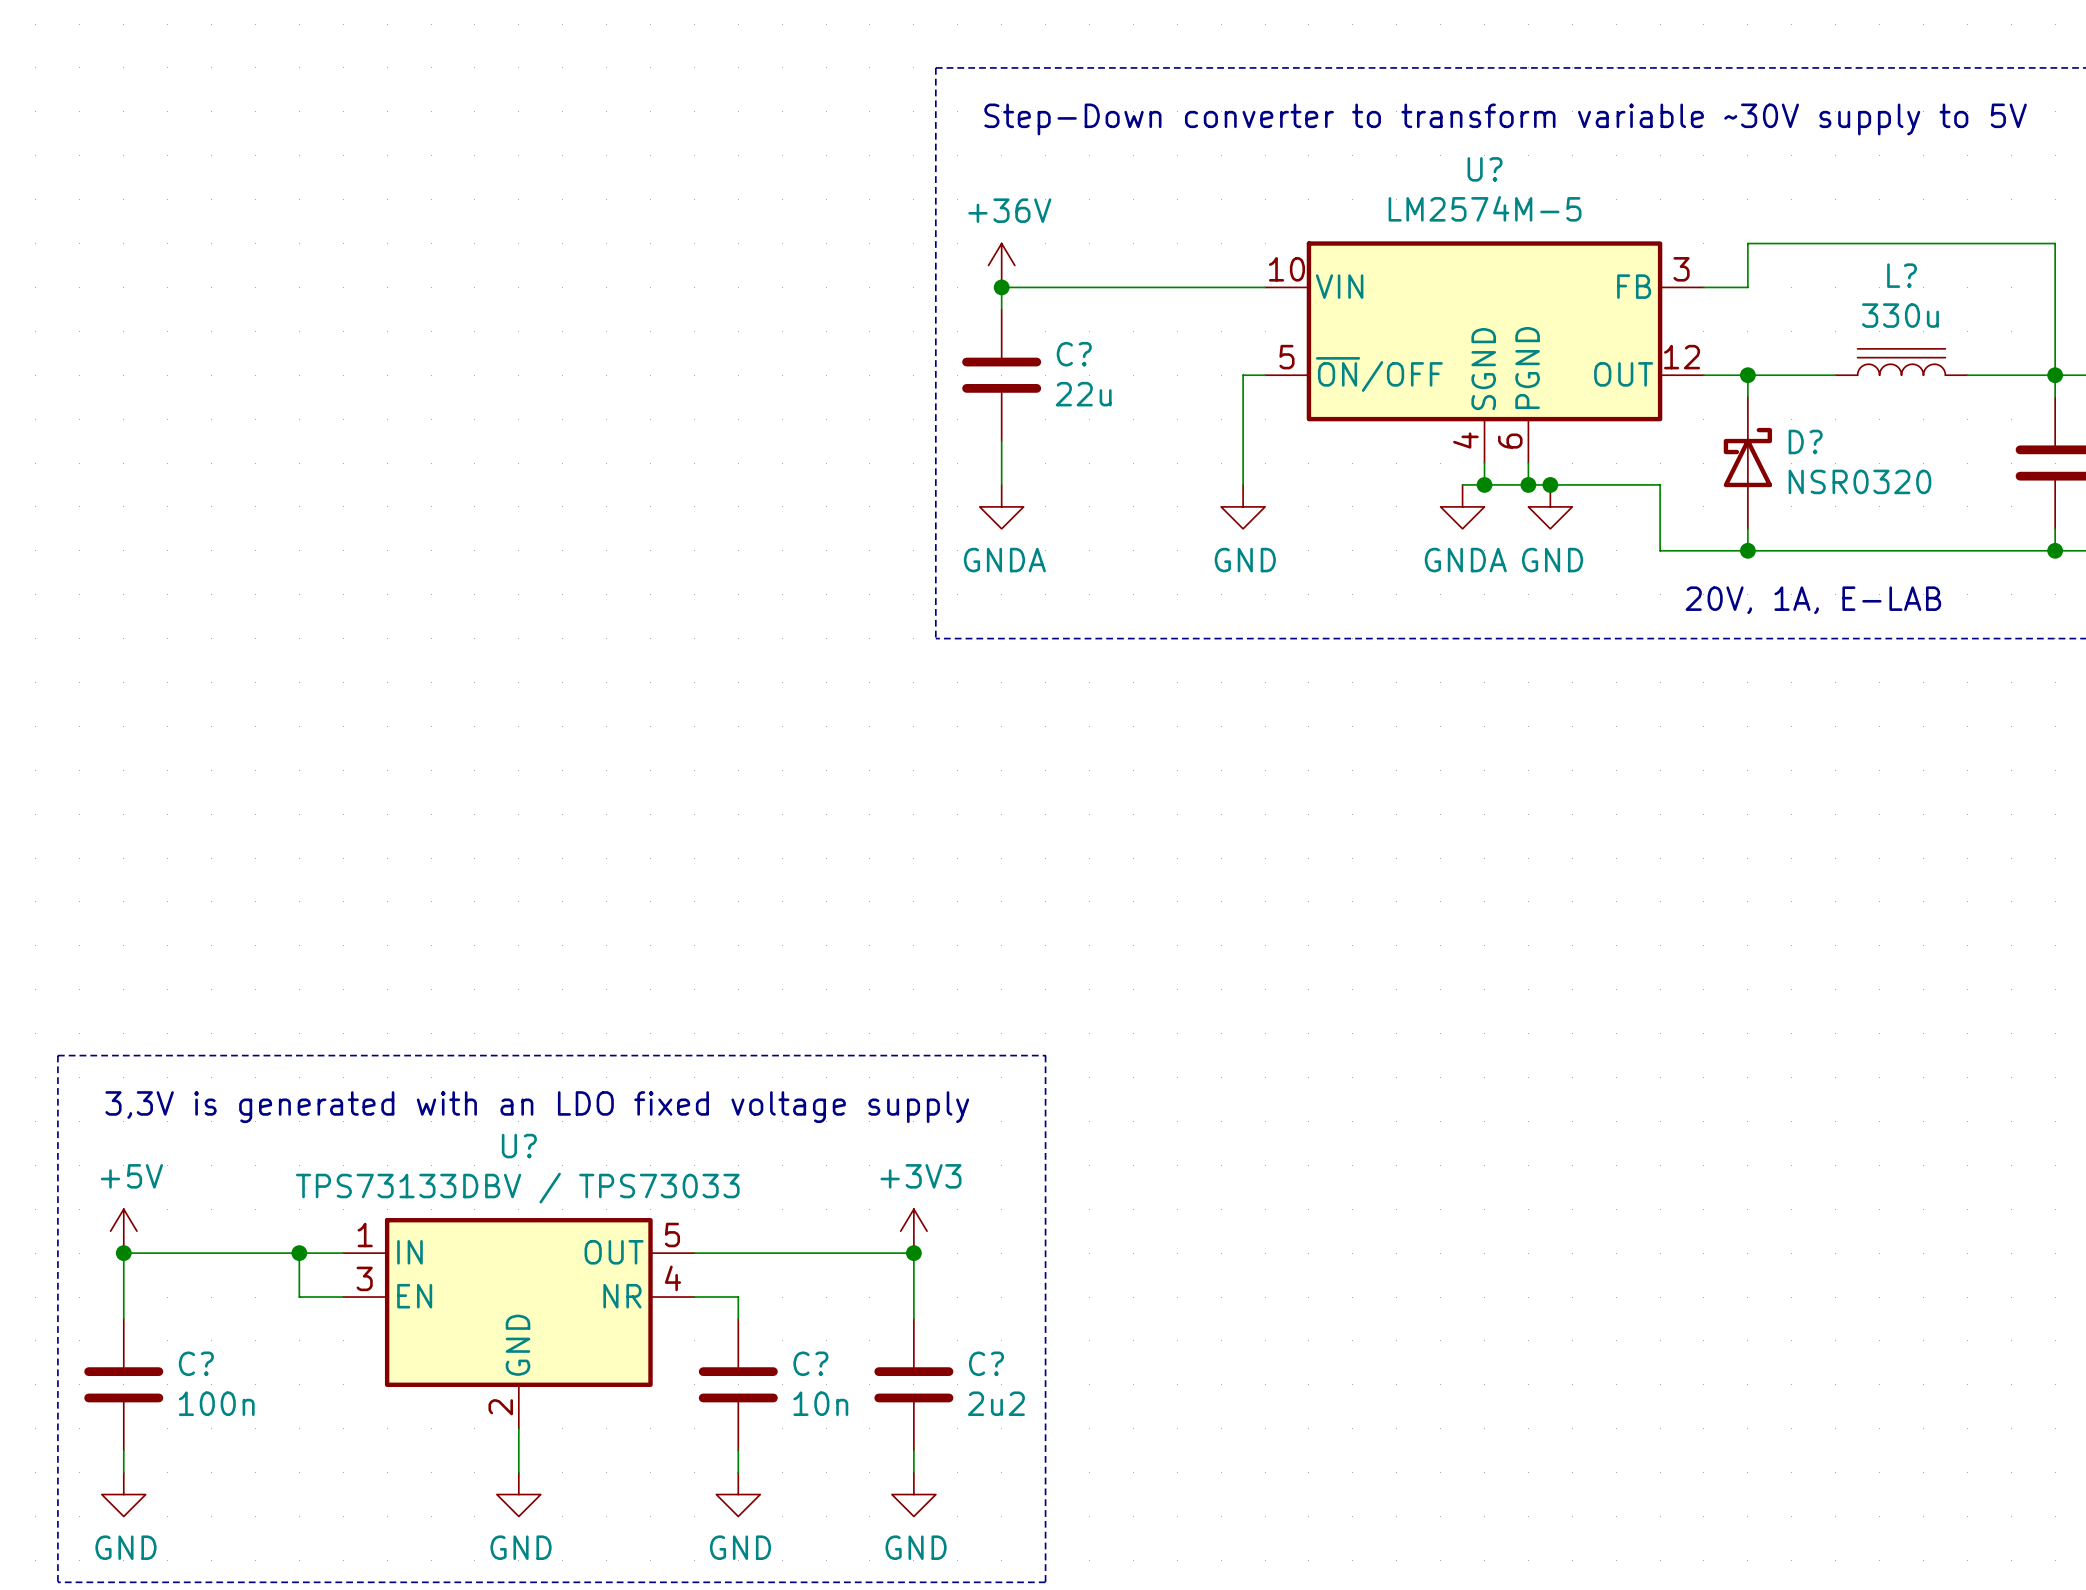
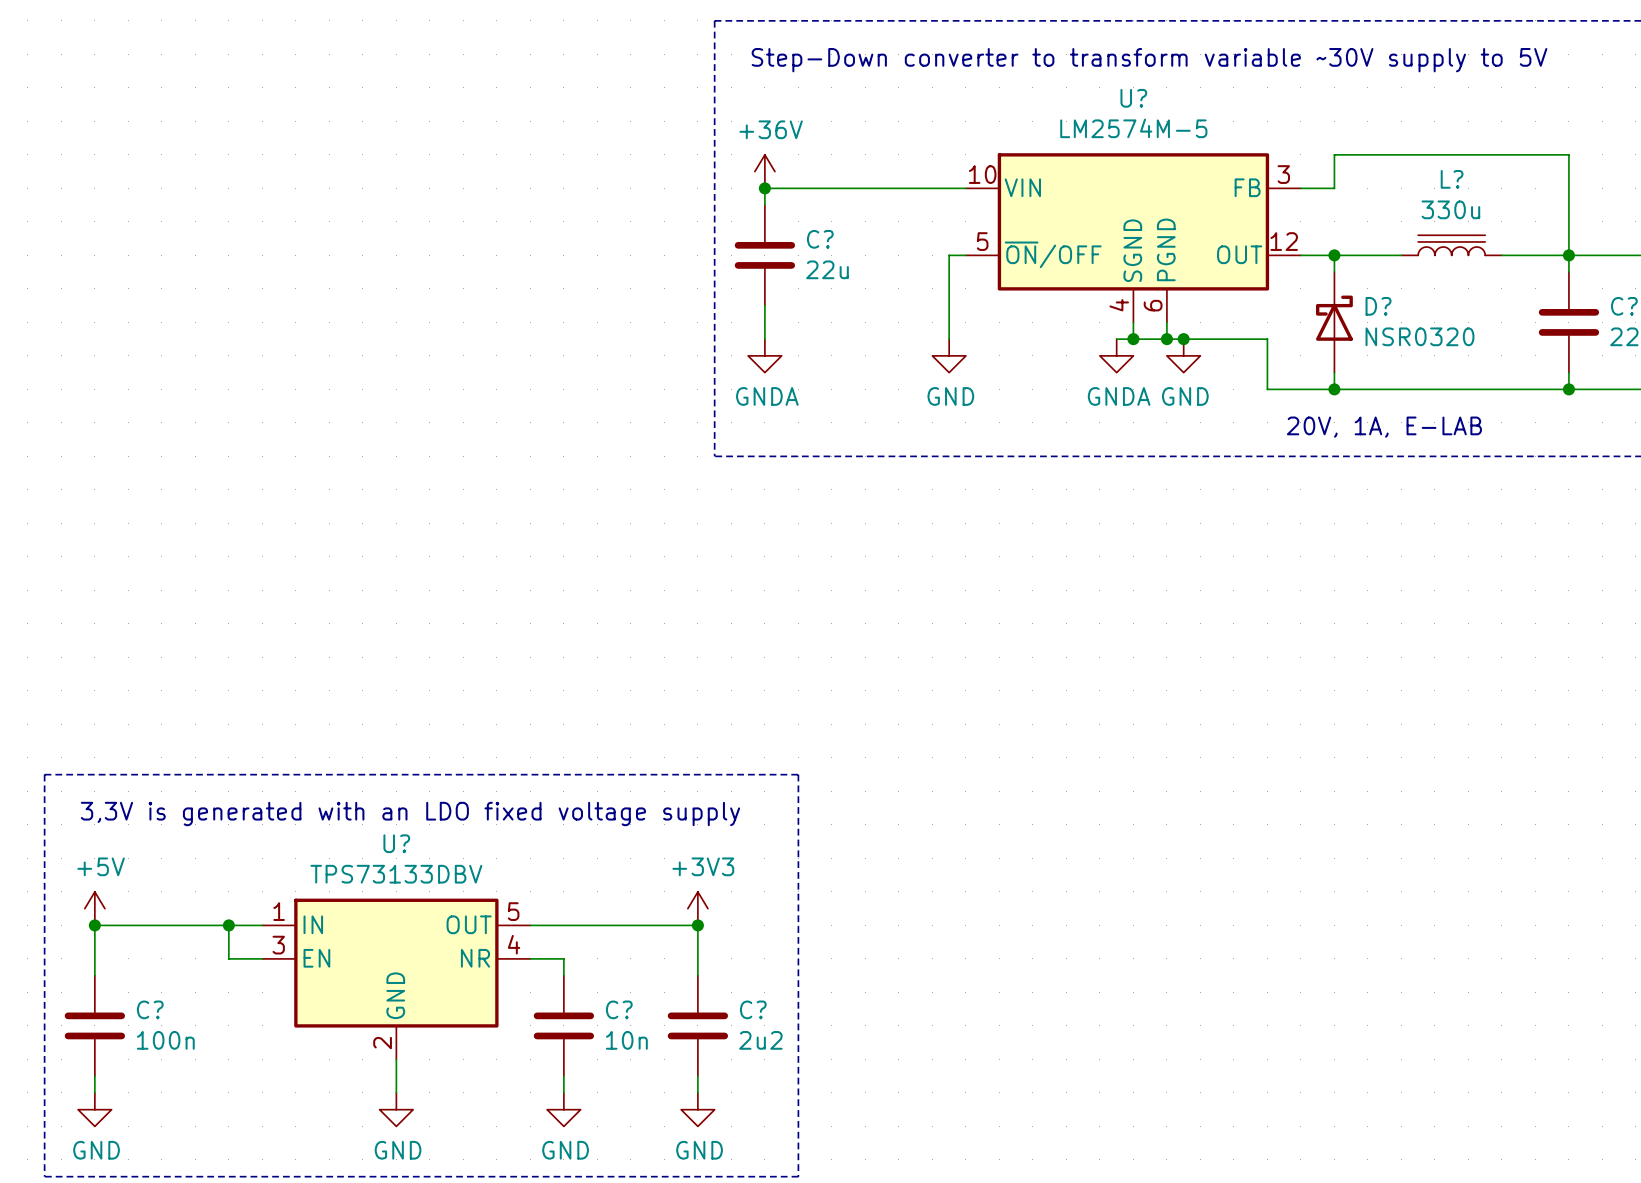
U? value: TPS73133DBV / TPS73033 (517, 1188) -> TPS73133DBV (396, 874)

